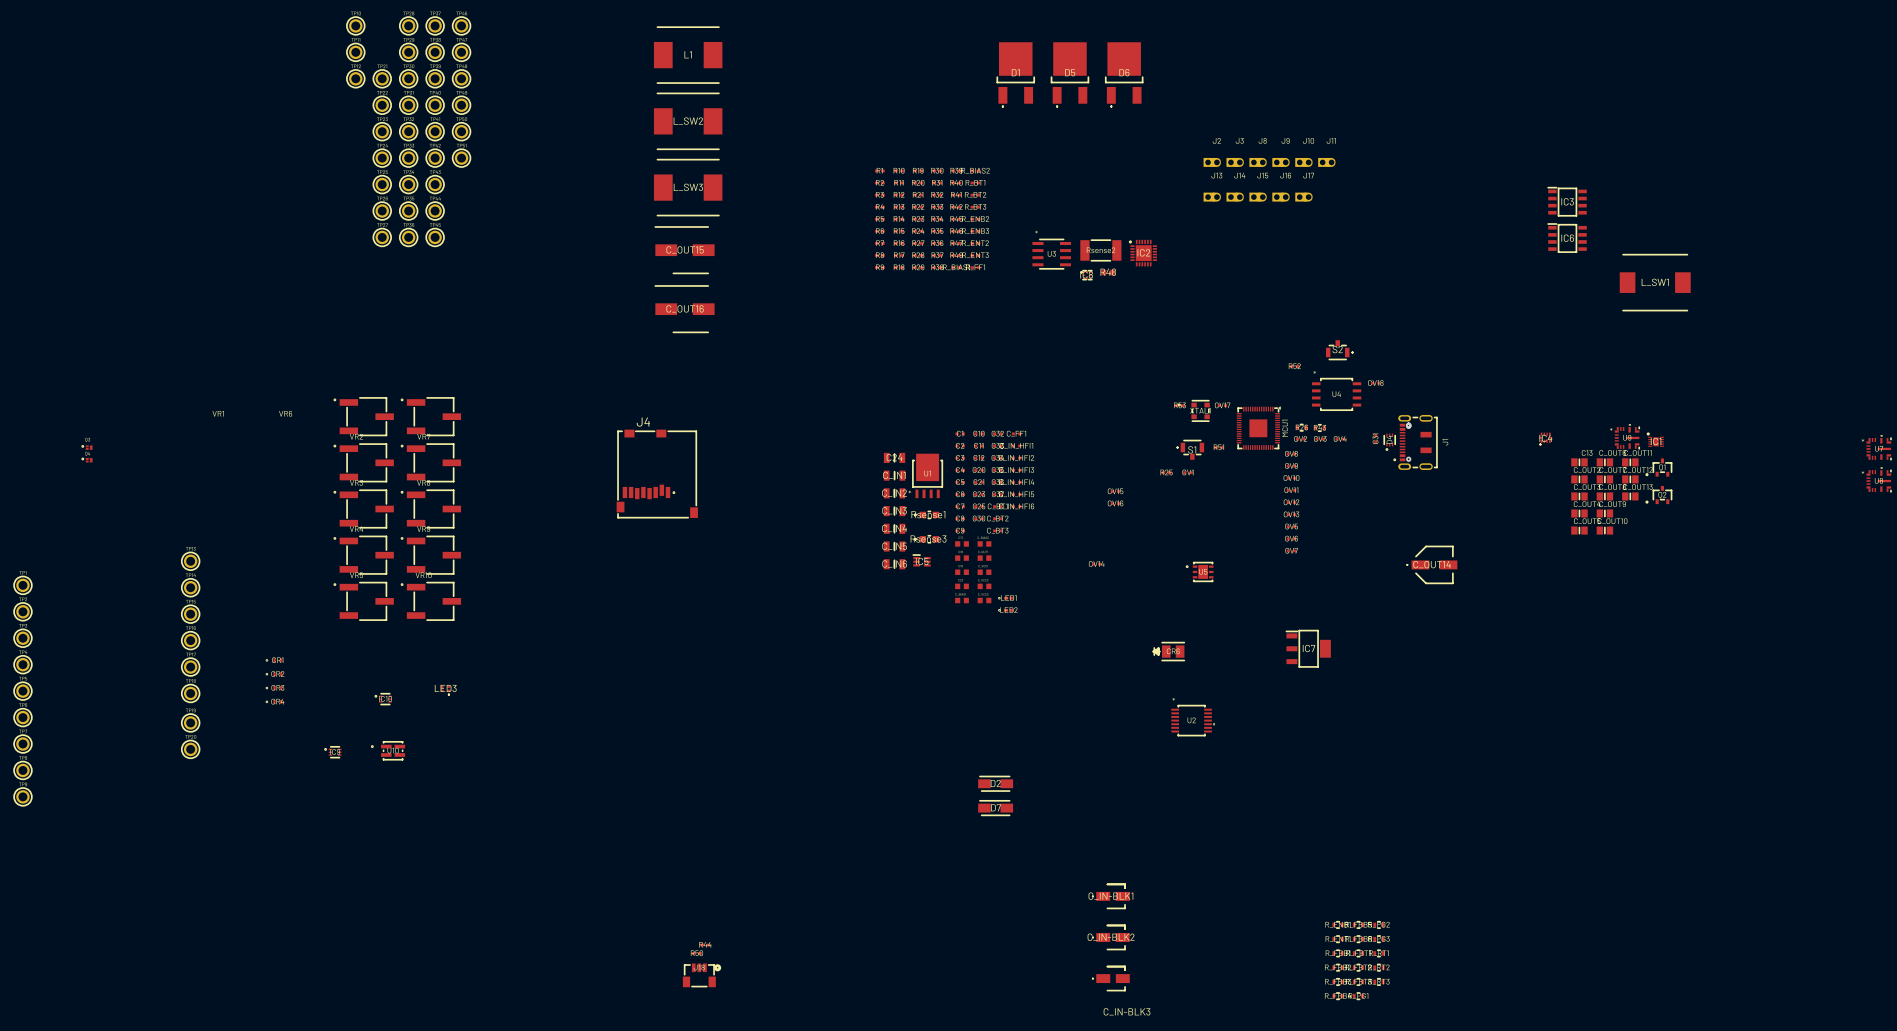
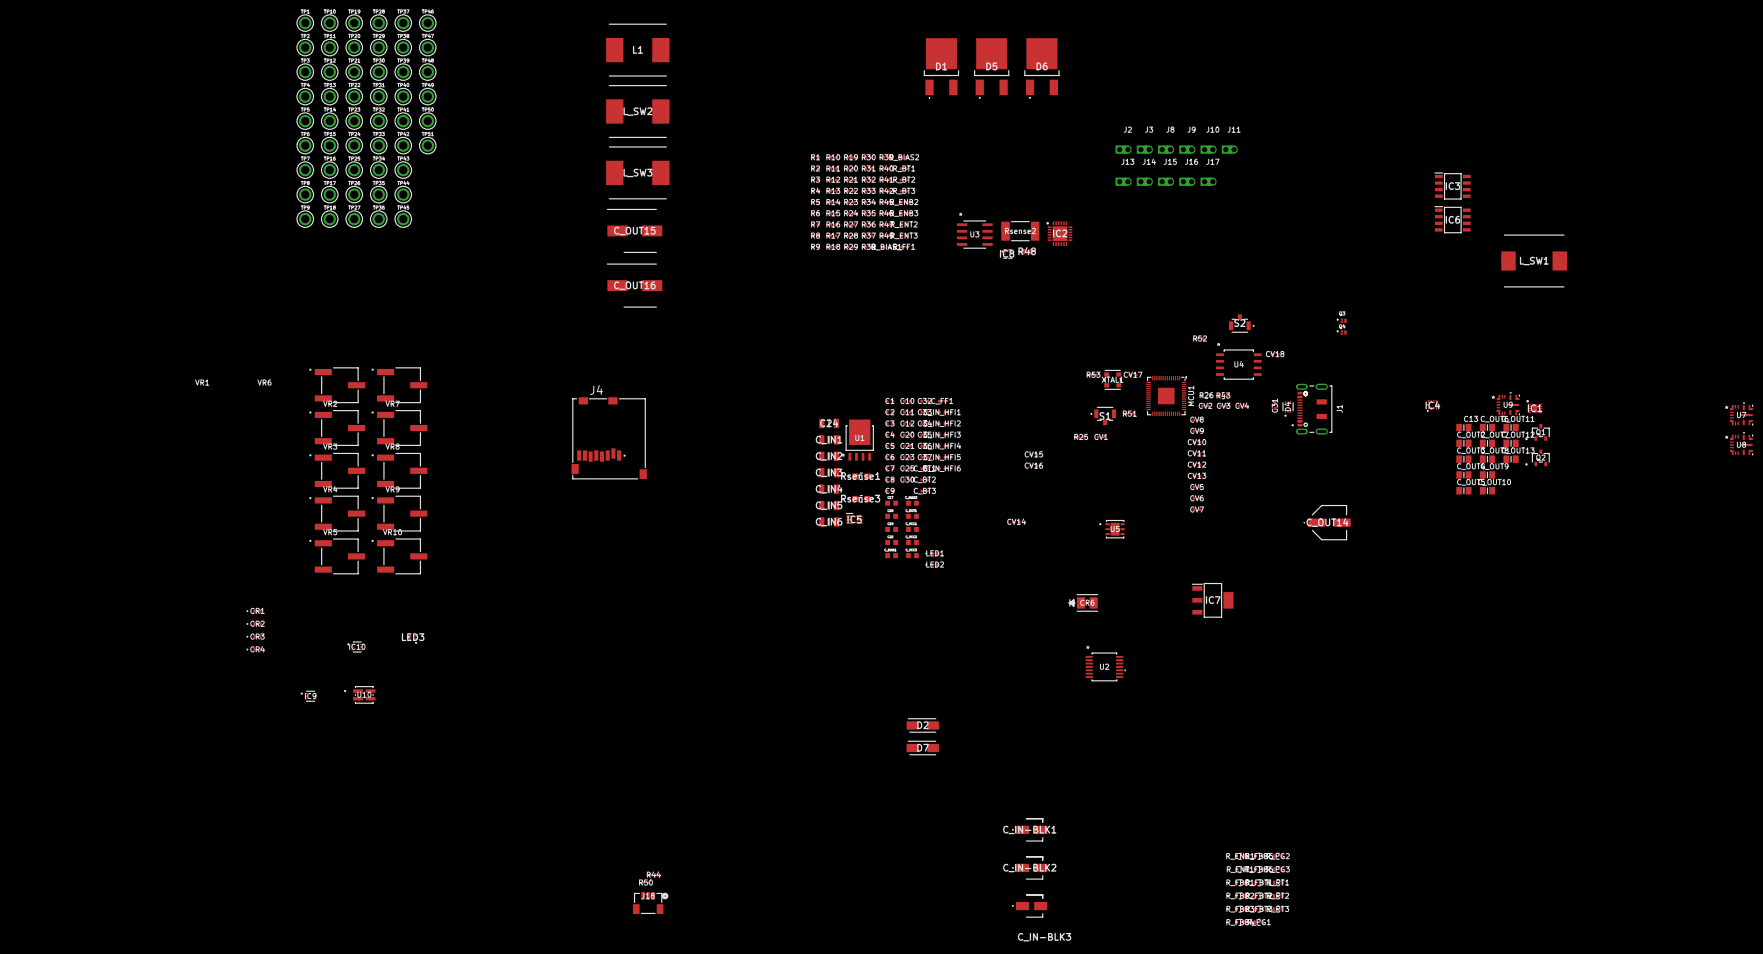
part position: (87, 447) -> (1341, 320)
part position: (87, 460) -> (1341, 332)
part position: (190, 561) -> (329, 96)
part position: (22, 585) -> (305, 23)
part position: (190, 587) -> (329, 121)
part position: (22, 611) -> (305, 47)
part position: (190, 614) -> (329, 145)
part position: (22, 638) -> (305, 72)
part position: (190, 640) -> (329, 170)
part position: (22, 664) -> (305, 96)
part position: (190, 667) -> (329, 194)
part position: (22, 691) -> (305, 121)
part position: (190, 693) -> (329, 219)
part position: (22, 717) -> (305, 145)
part position: (190, 722) -> (354, 23)
part position: (22, 744) -> (305, 170)
part position: (190, 749) -> (354, 47)
part position: (22, 770) -> (305, 194)
part position: (22, 796) -> (305, 219)

